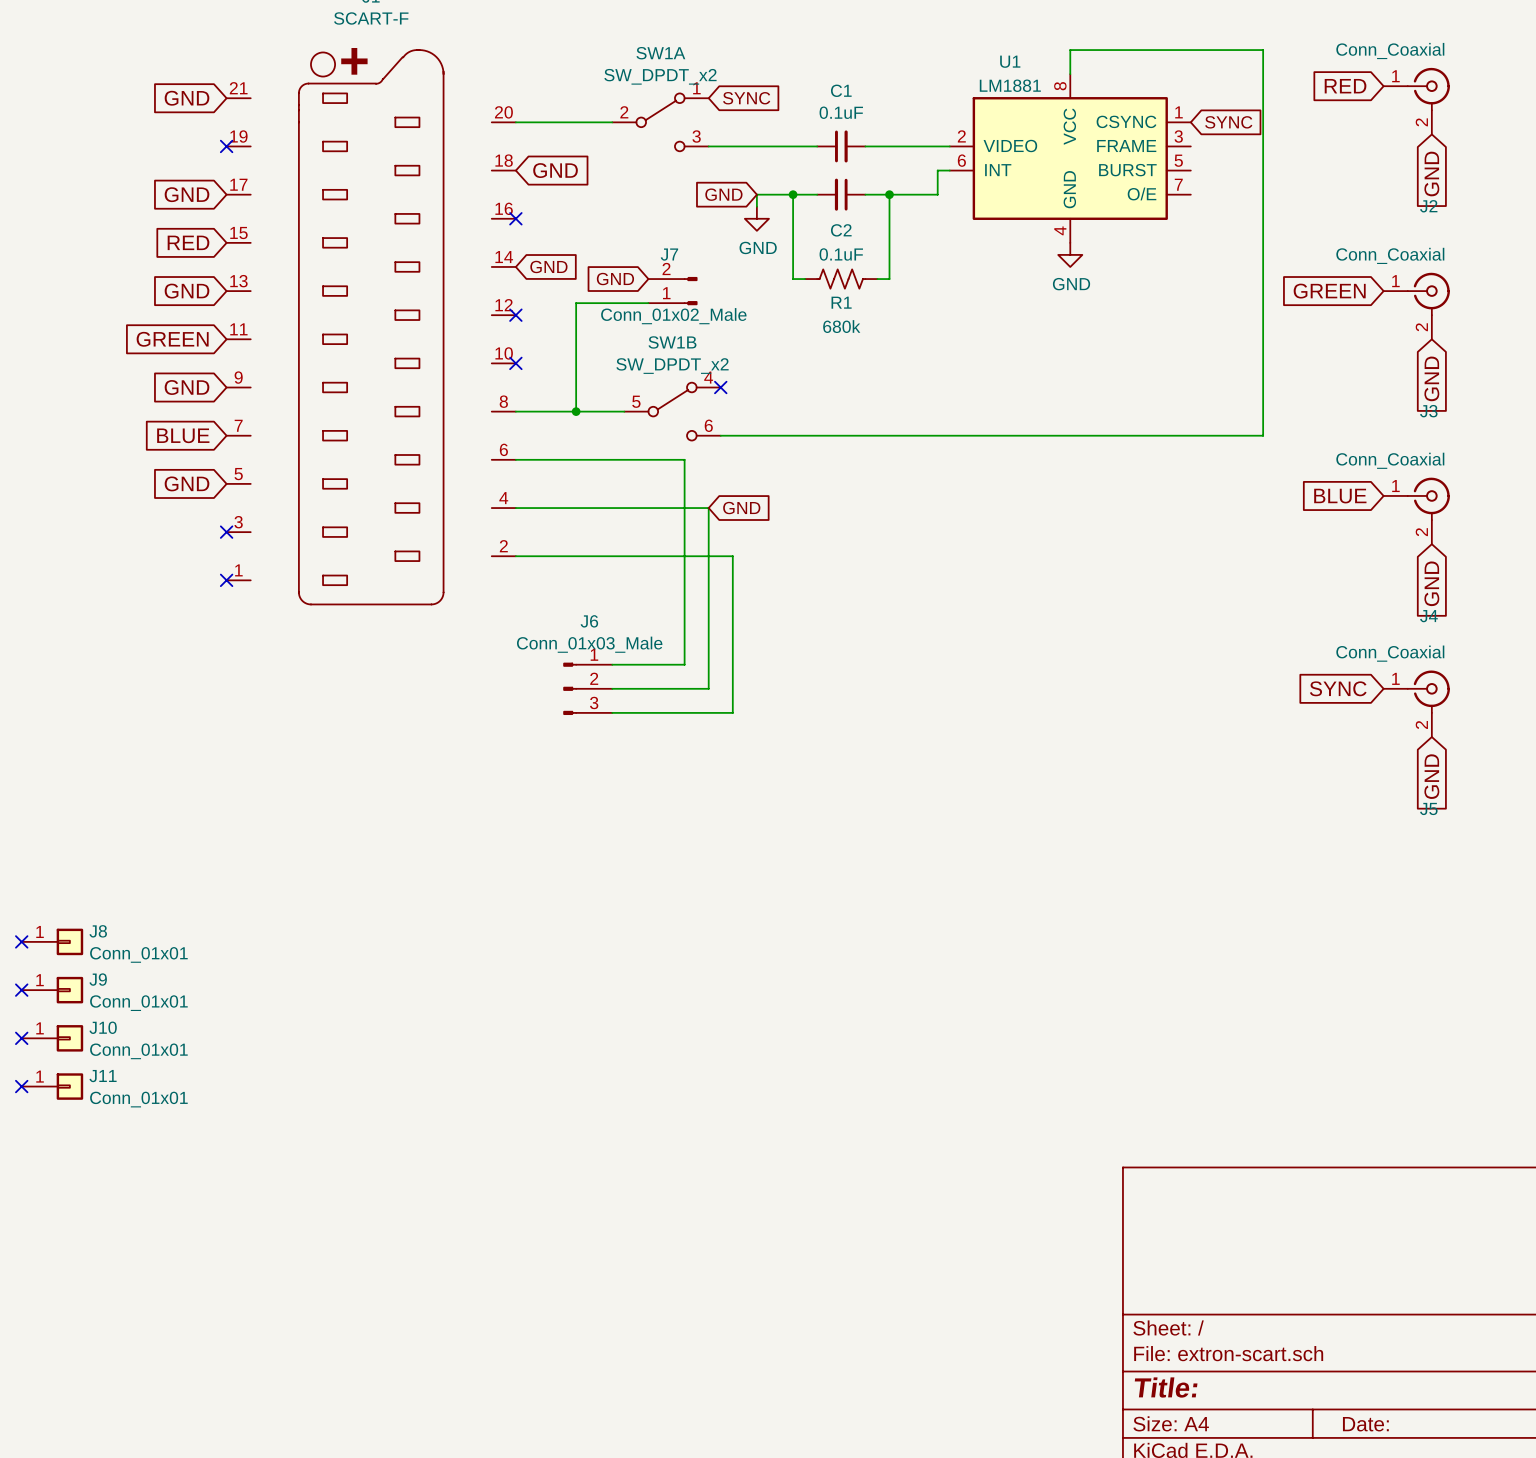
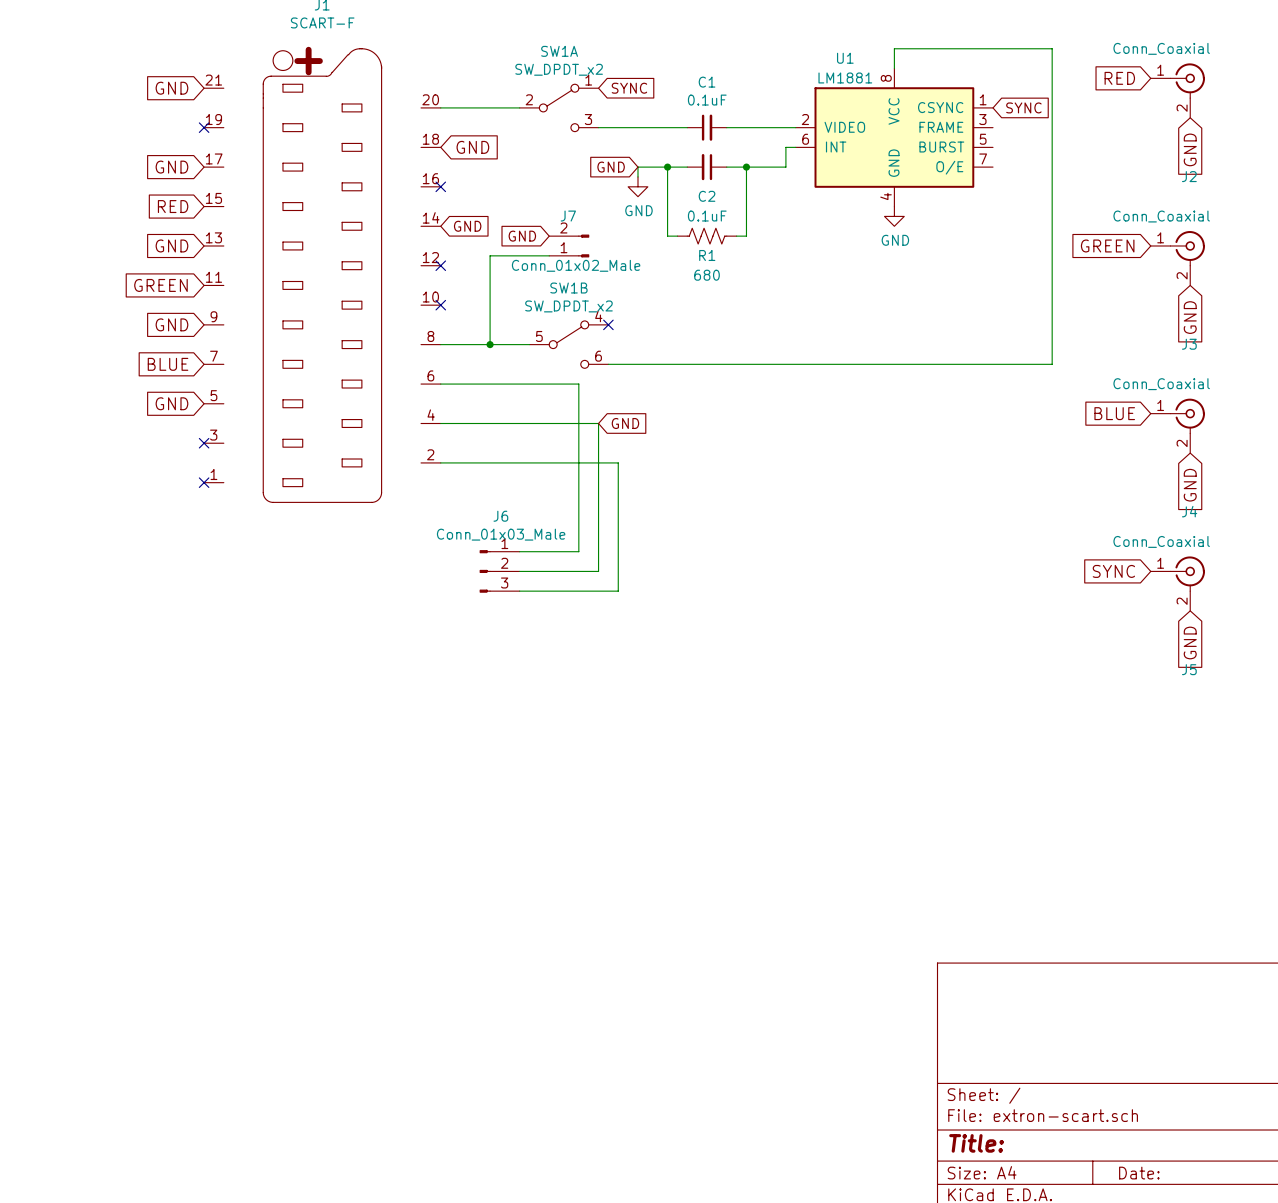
R1 value: 680k (841, 326) -> 680 (707, 275)
no-connect mark: (21, 941) -> none
J8: Conn_01x01 (52, 941) -> none
no-connect mark: (21, 990) -> none
J9: Conn_01x01 (52, 990) -> none
no-connect mark: (21, 1038) -> none
J10: Conn_01x01 (52, 1038) -> none
no-connect mark: (21, 1086) -> none
J11: Conn_01x01 (52, 1086) -> none

